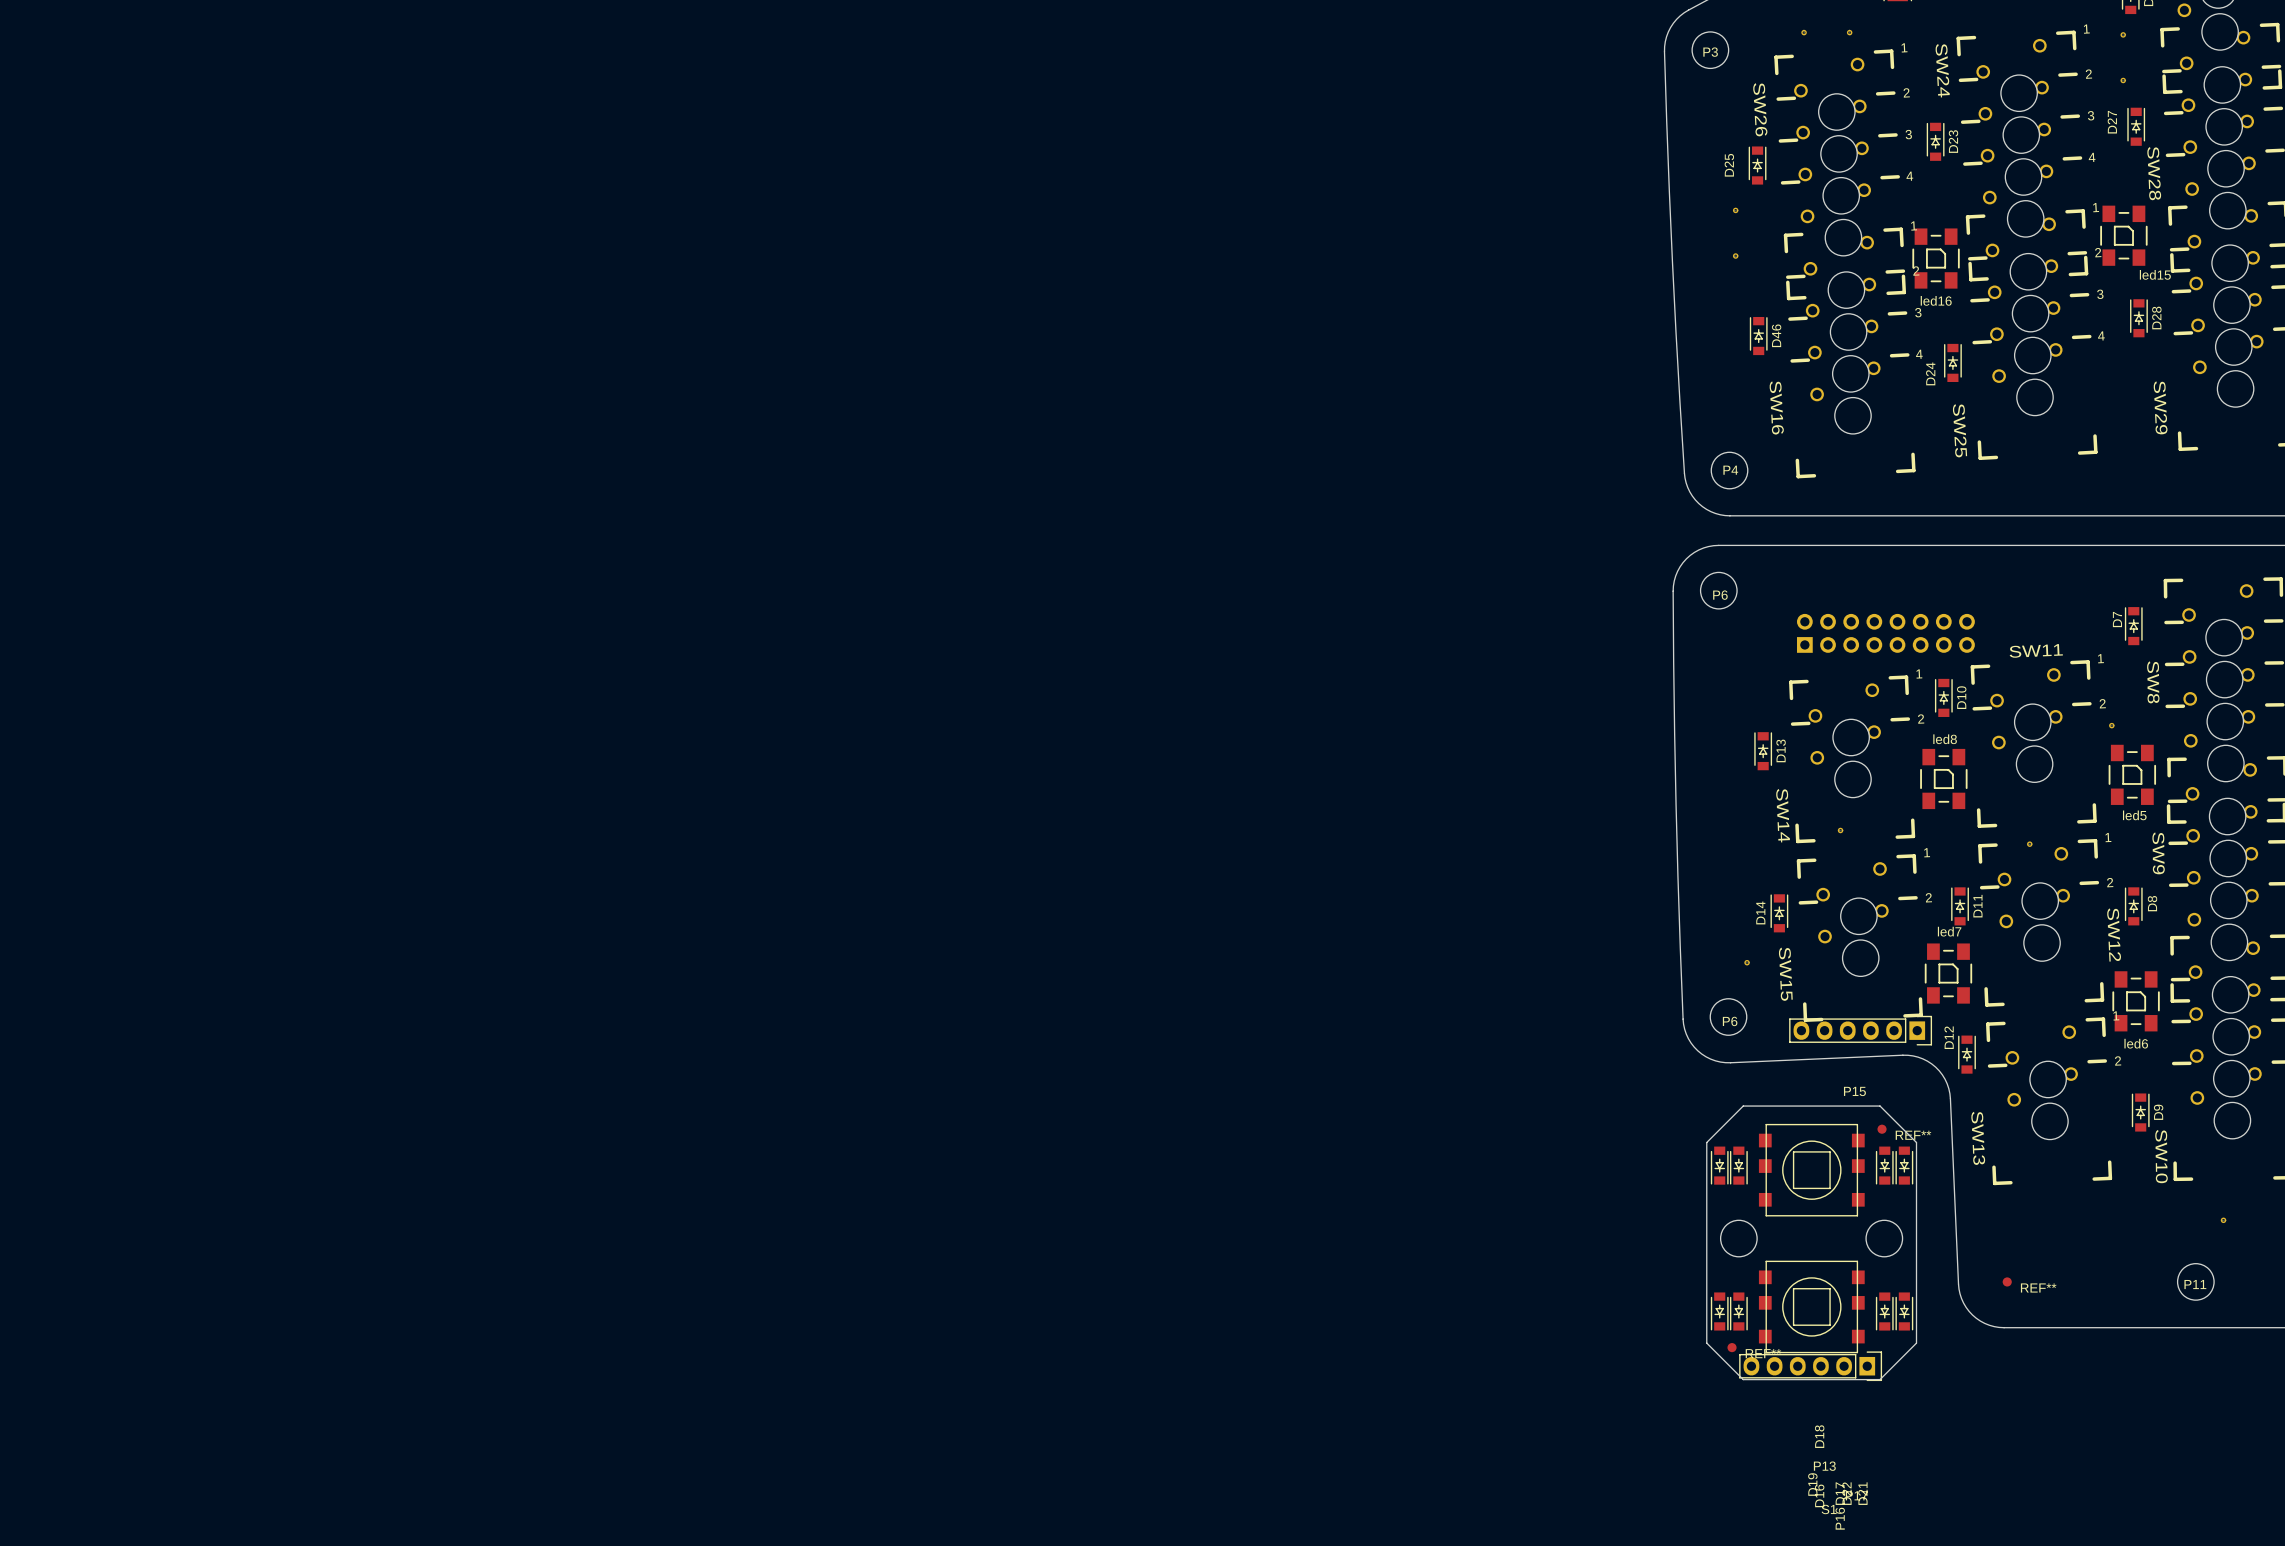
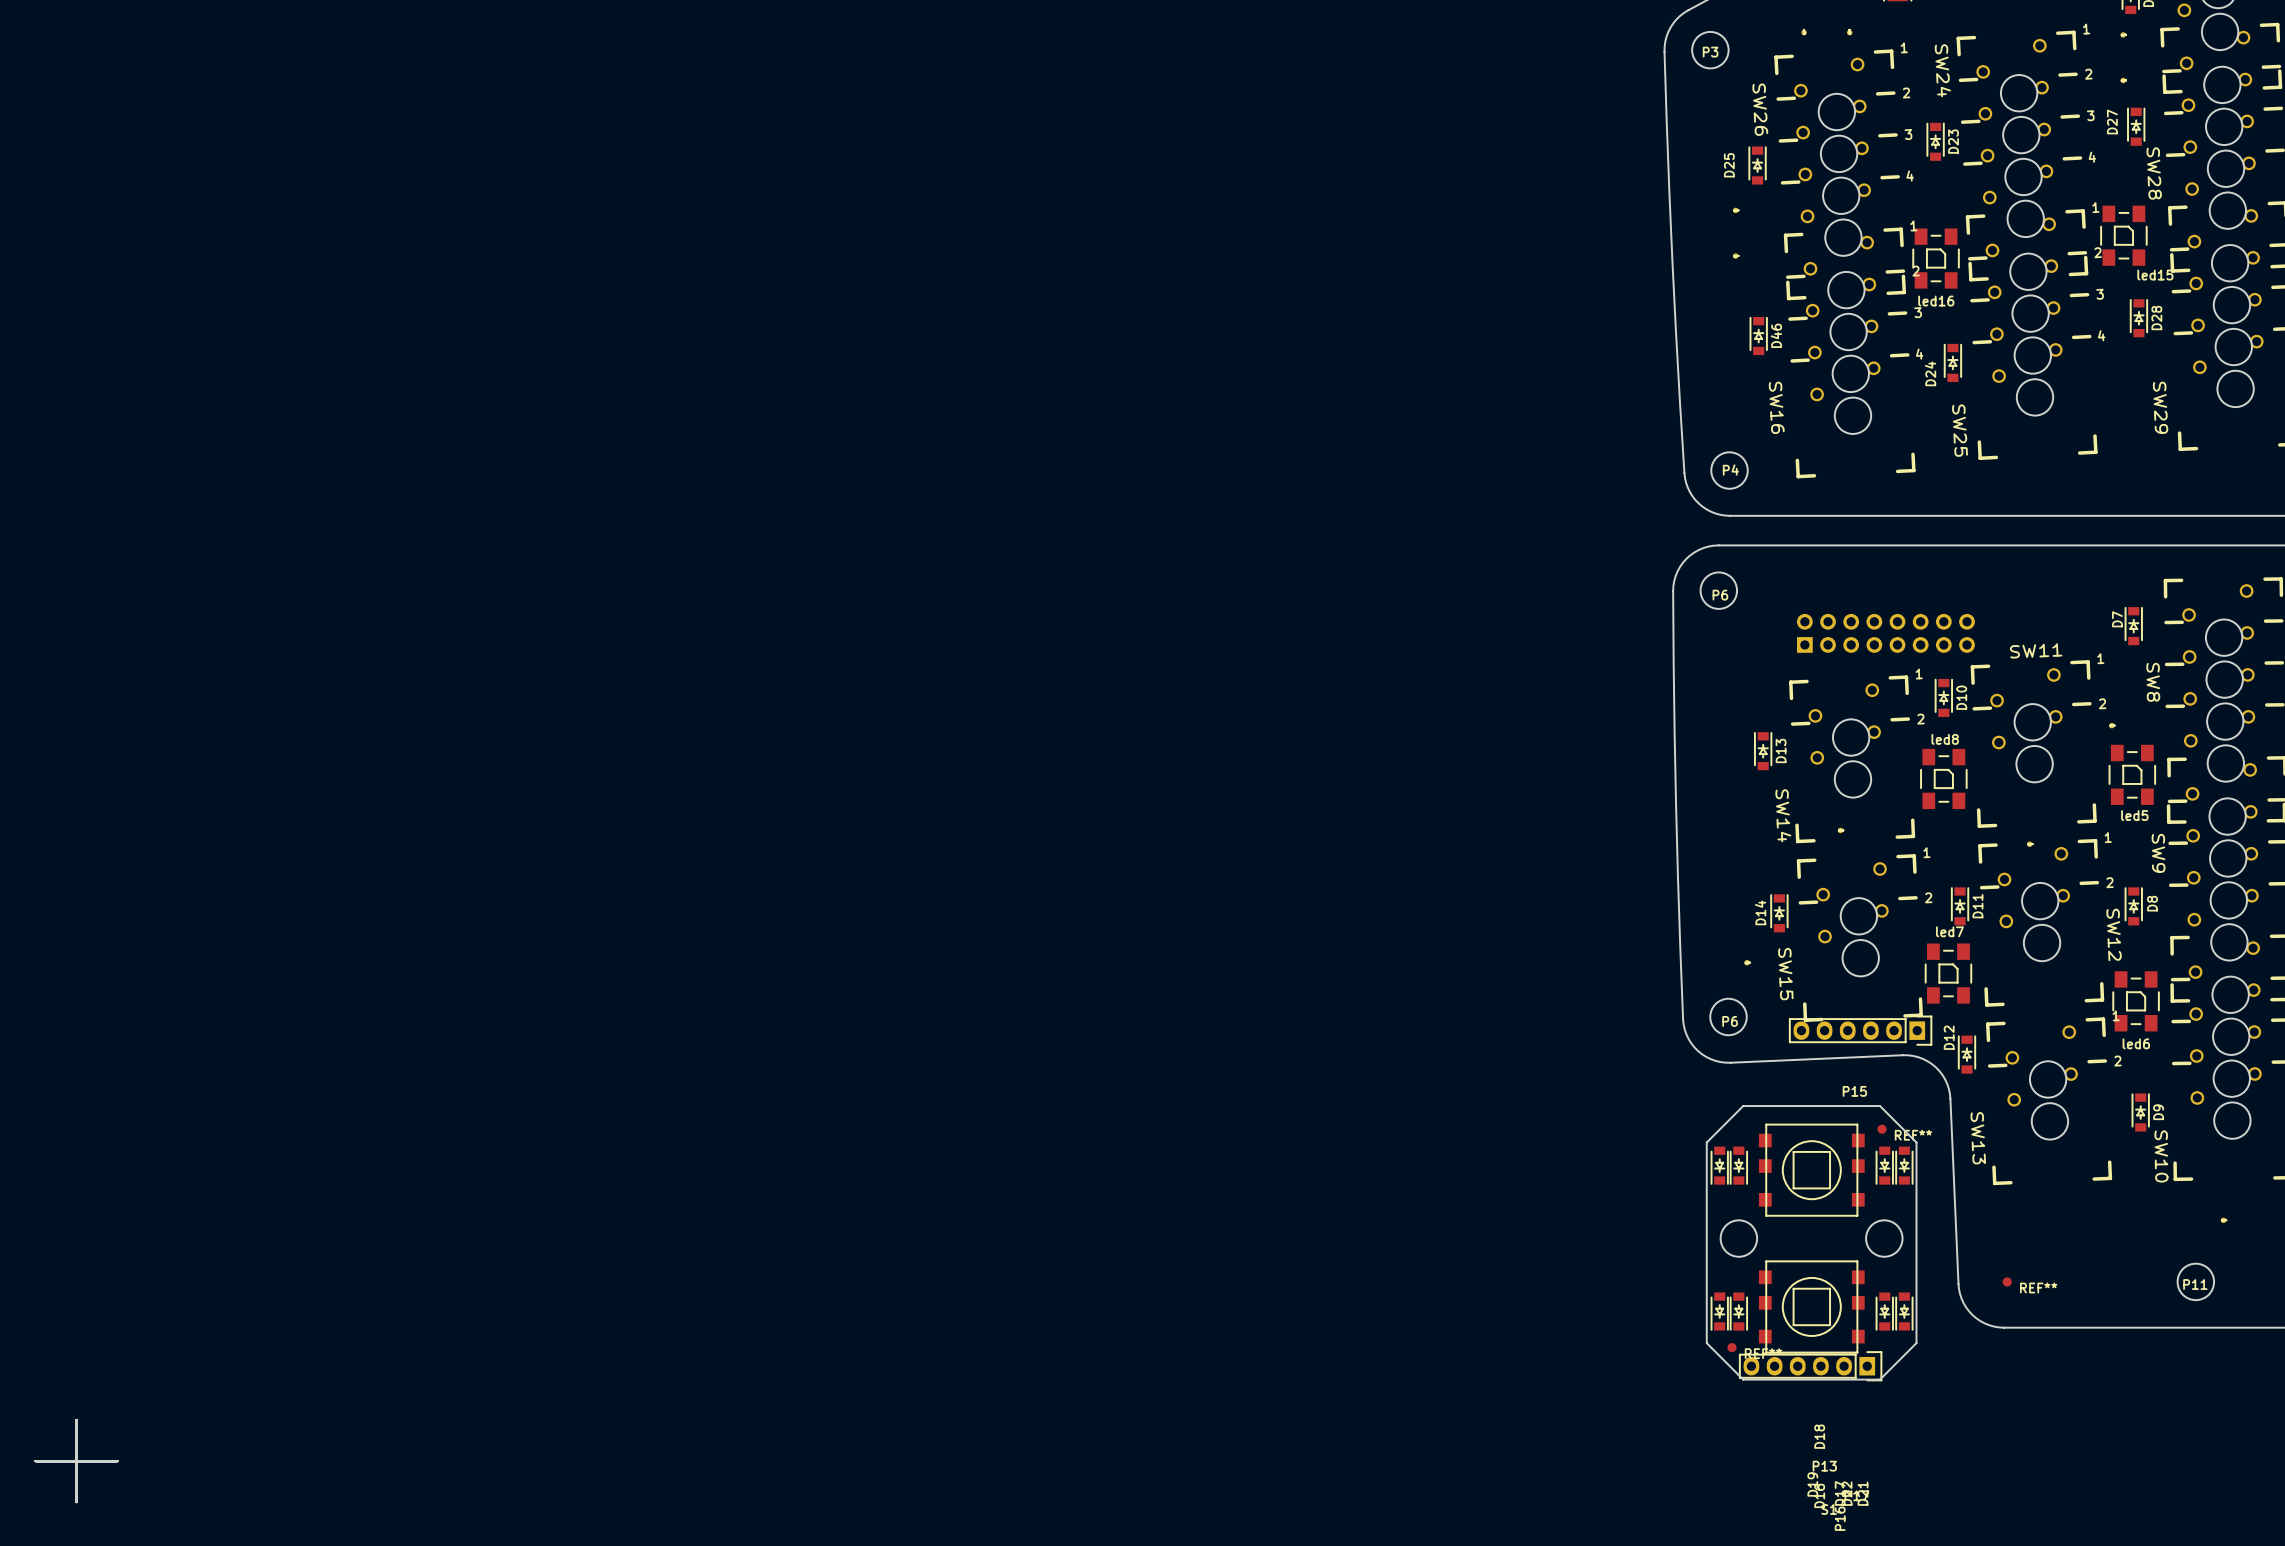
board edge: none -> (76, 1420) (76, 1502)
board edge: none -> (35, 1461) (117, 1461)

